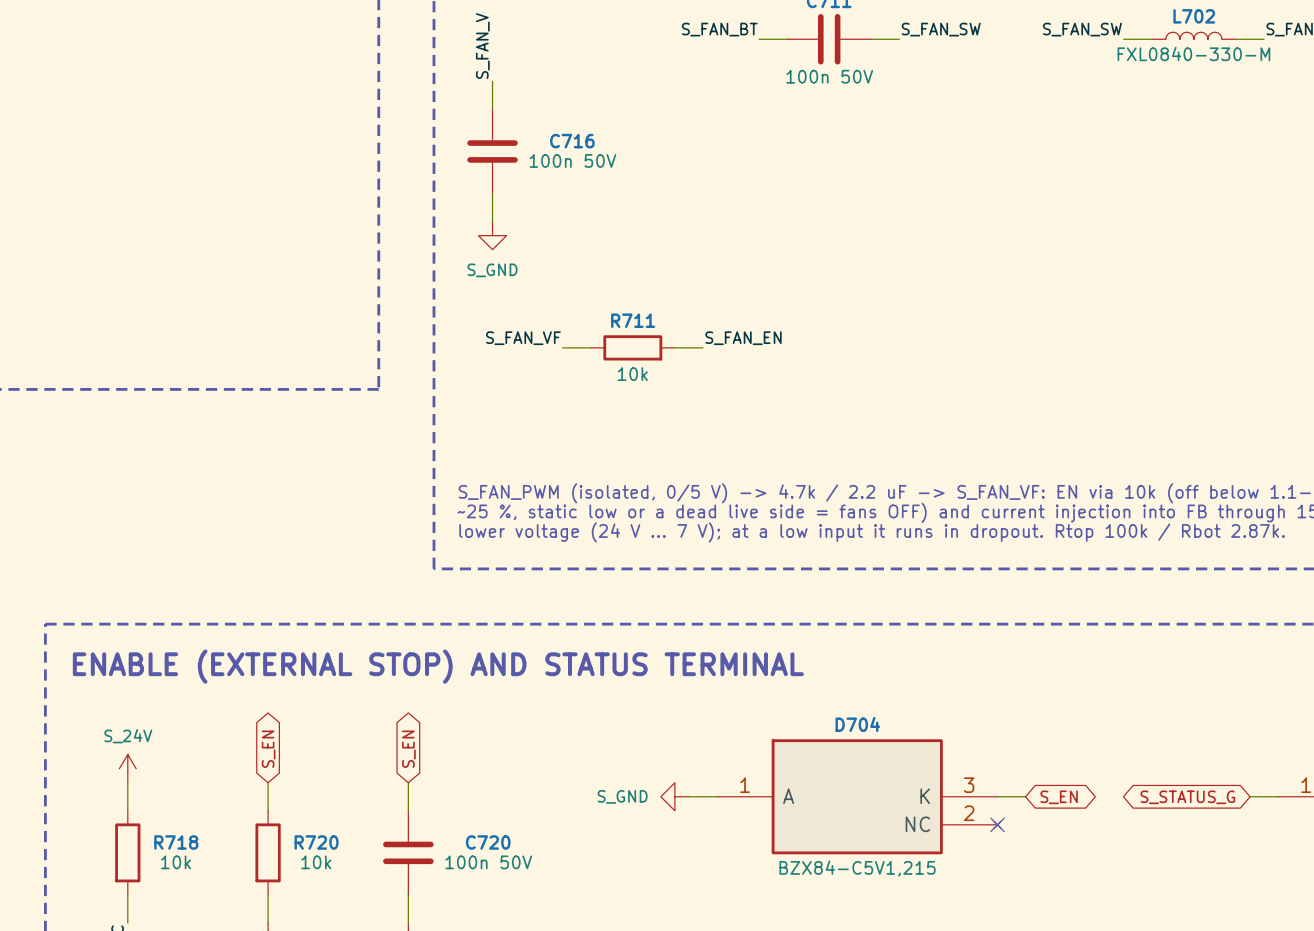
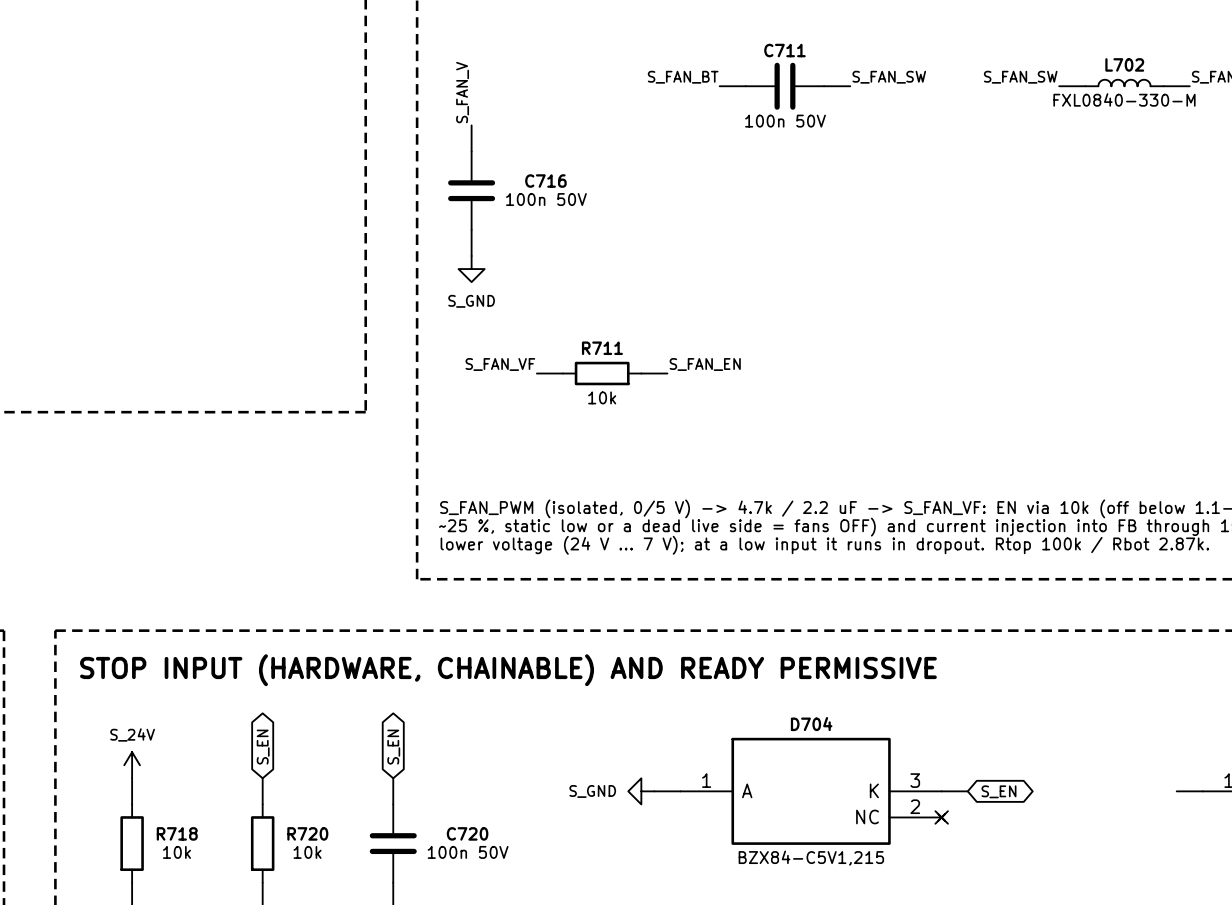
text: ENABLE (EXTERNAL STOP) AND STATUS TERMINAL (438, 666) -> STOP INPUT (HARDWARE, CHAINABLE) AND READY PERMISSIVE (508, 670)
global label: S_STATUS_G (1187, 797) -> none

